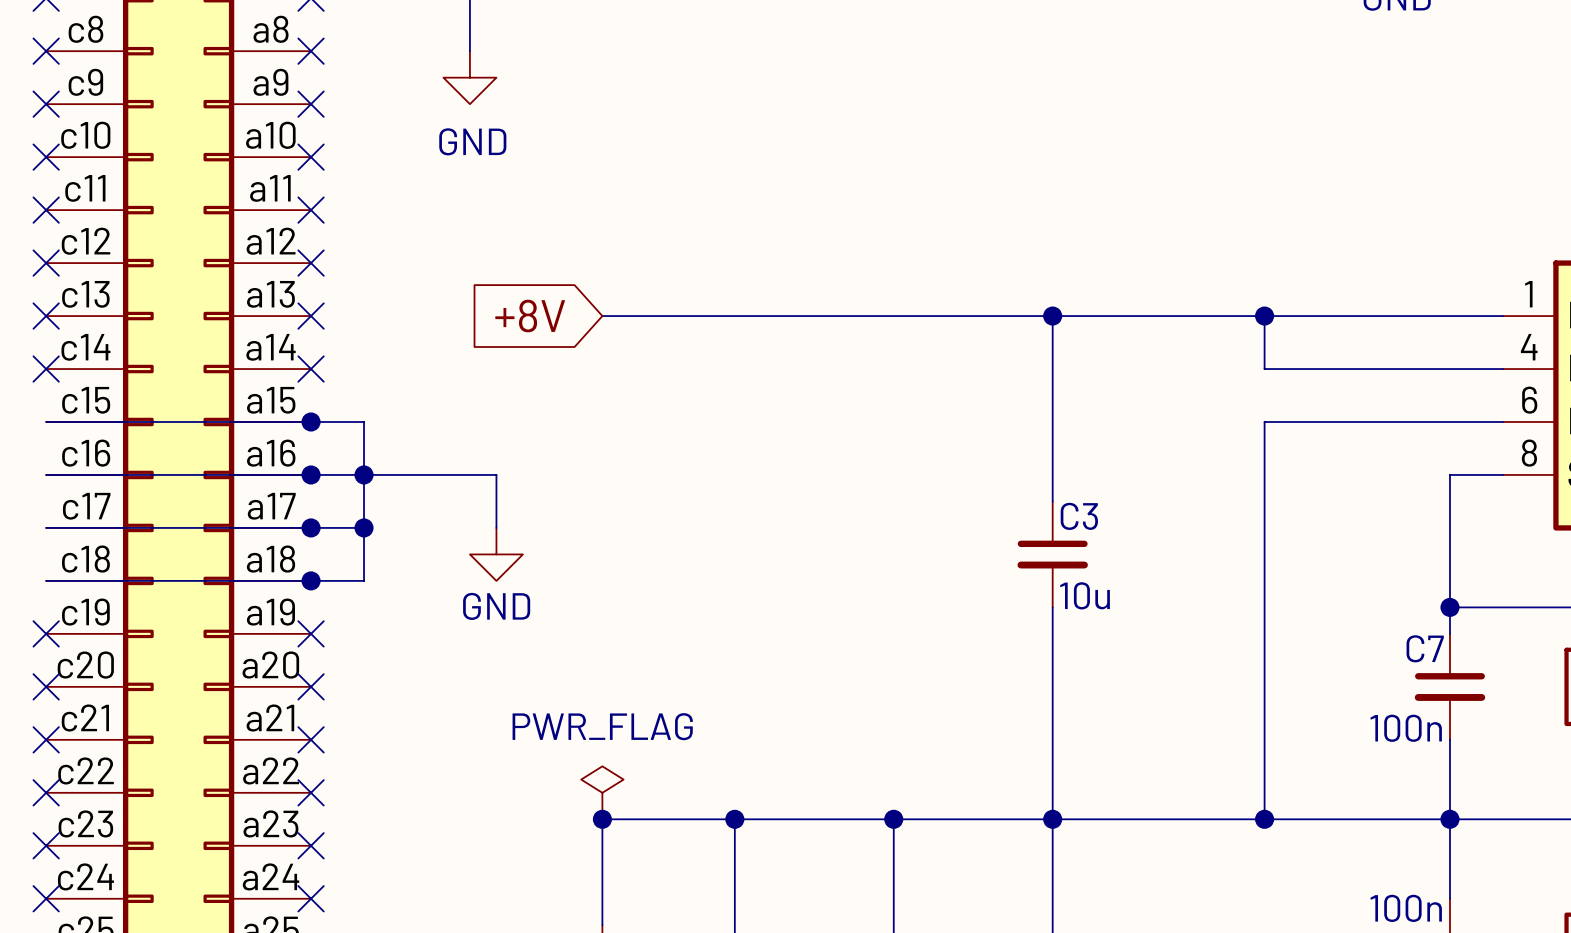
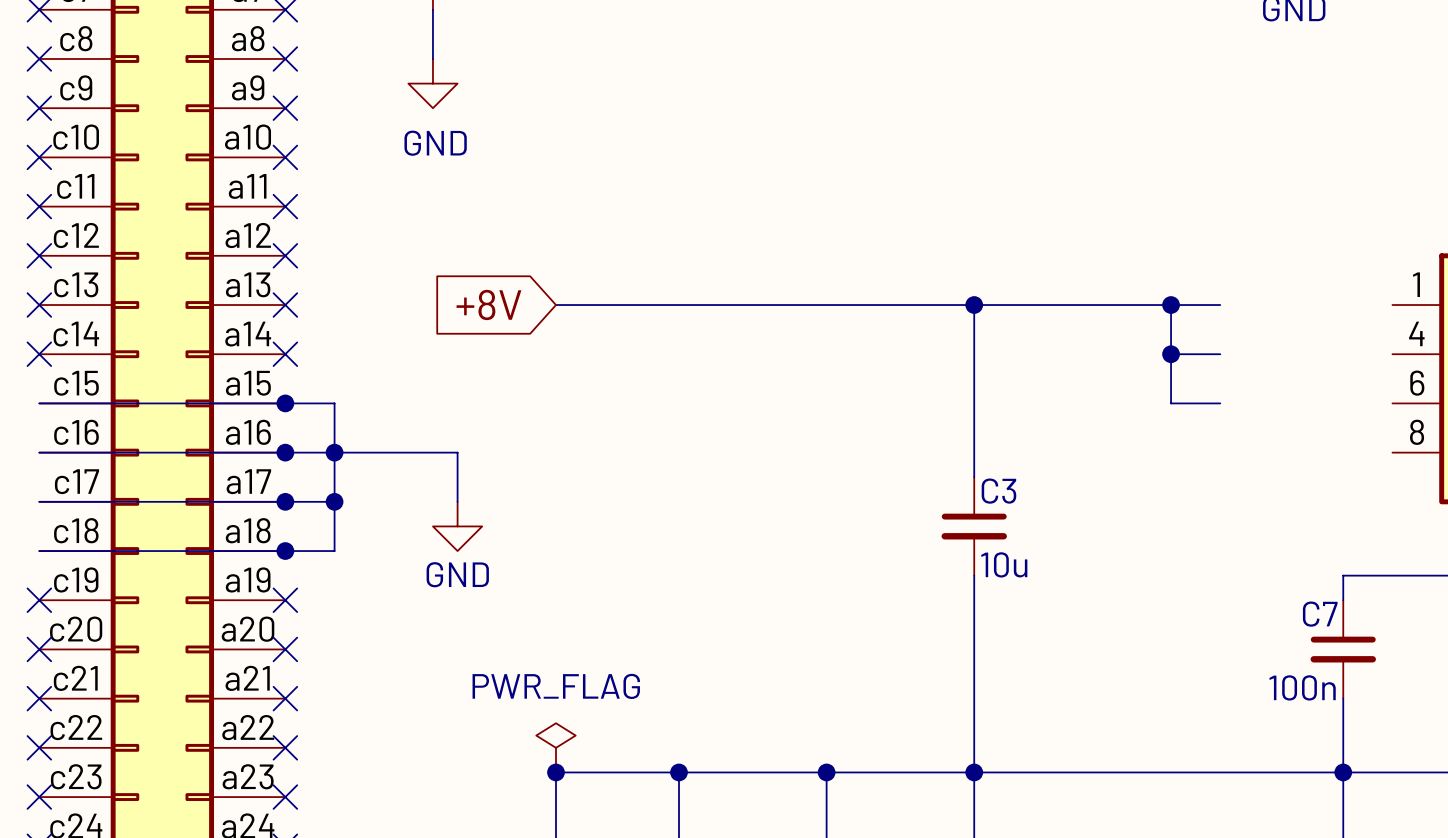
wire: (1317, 316) (1502, 316) -> none
junction: none -> (1171, 354)
wire: (1317, 369) (1502, 369) -> none
wire: (1264, 421) (1264, 819) -> (1171, 403) (1171, 354)
wire: (1317, 421) (1502, 421) -> none
wire: (1502, 474) (1449, 474) (1449, 607) -> none
junction: (1449, 607) -> none
junction: (1264, 819) -> none

